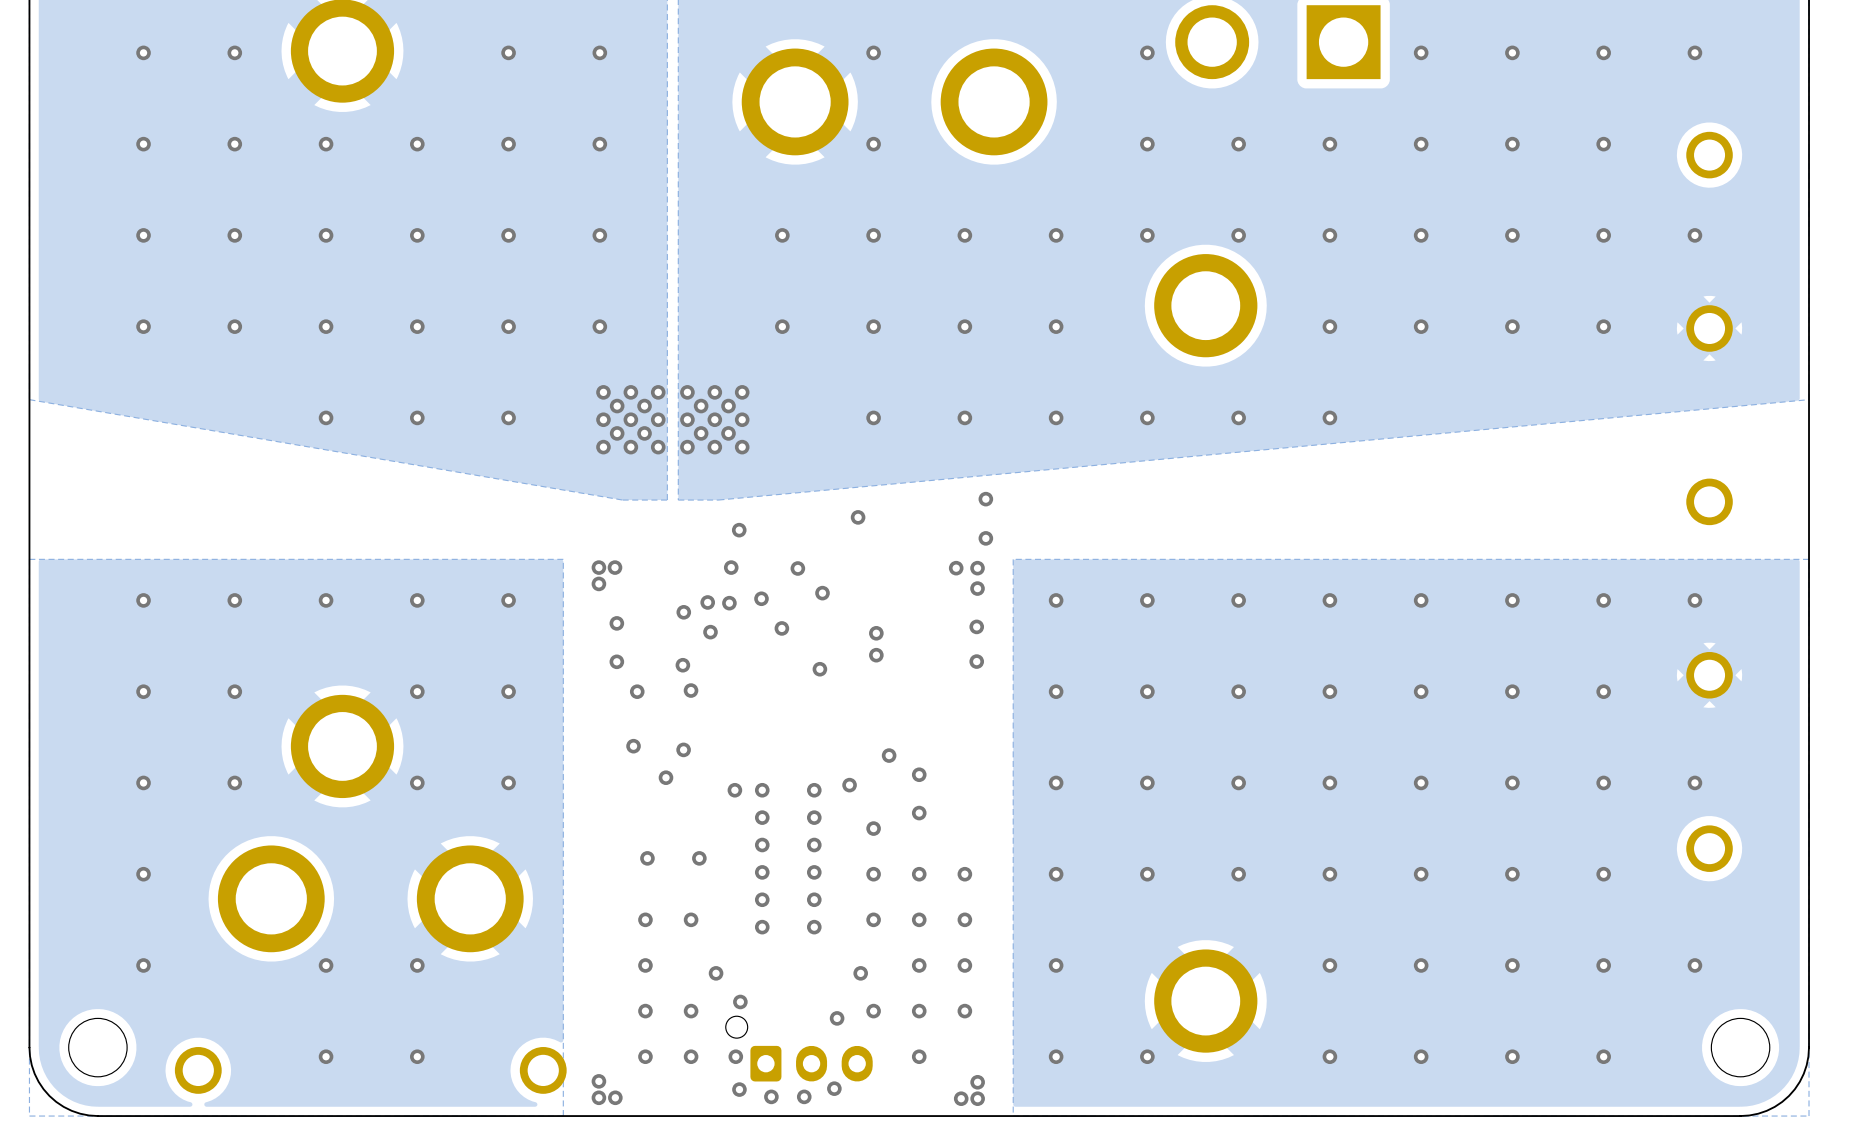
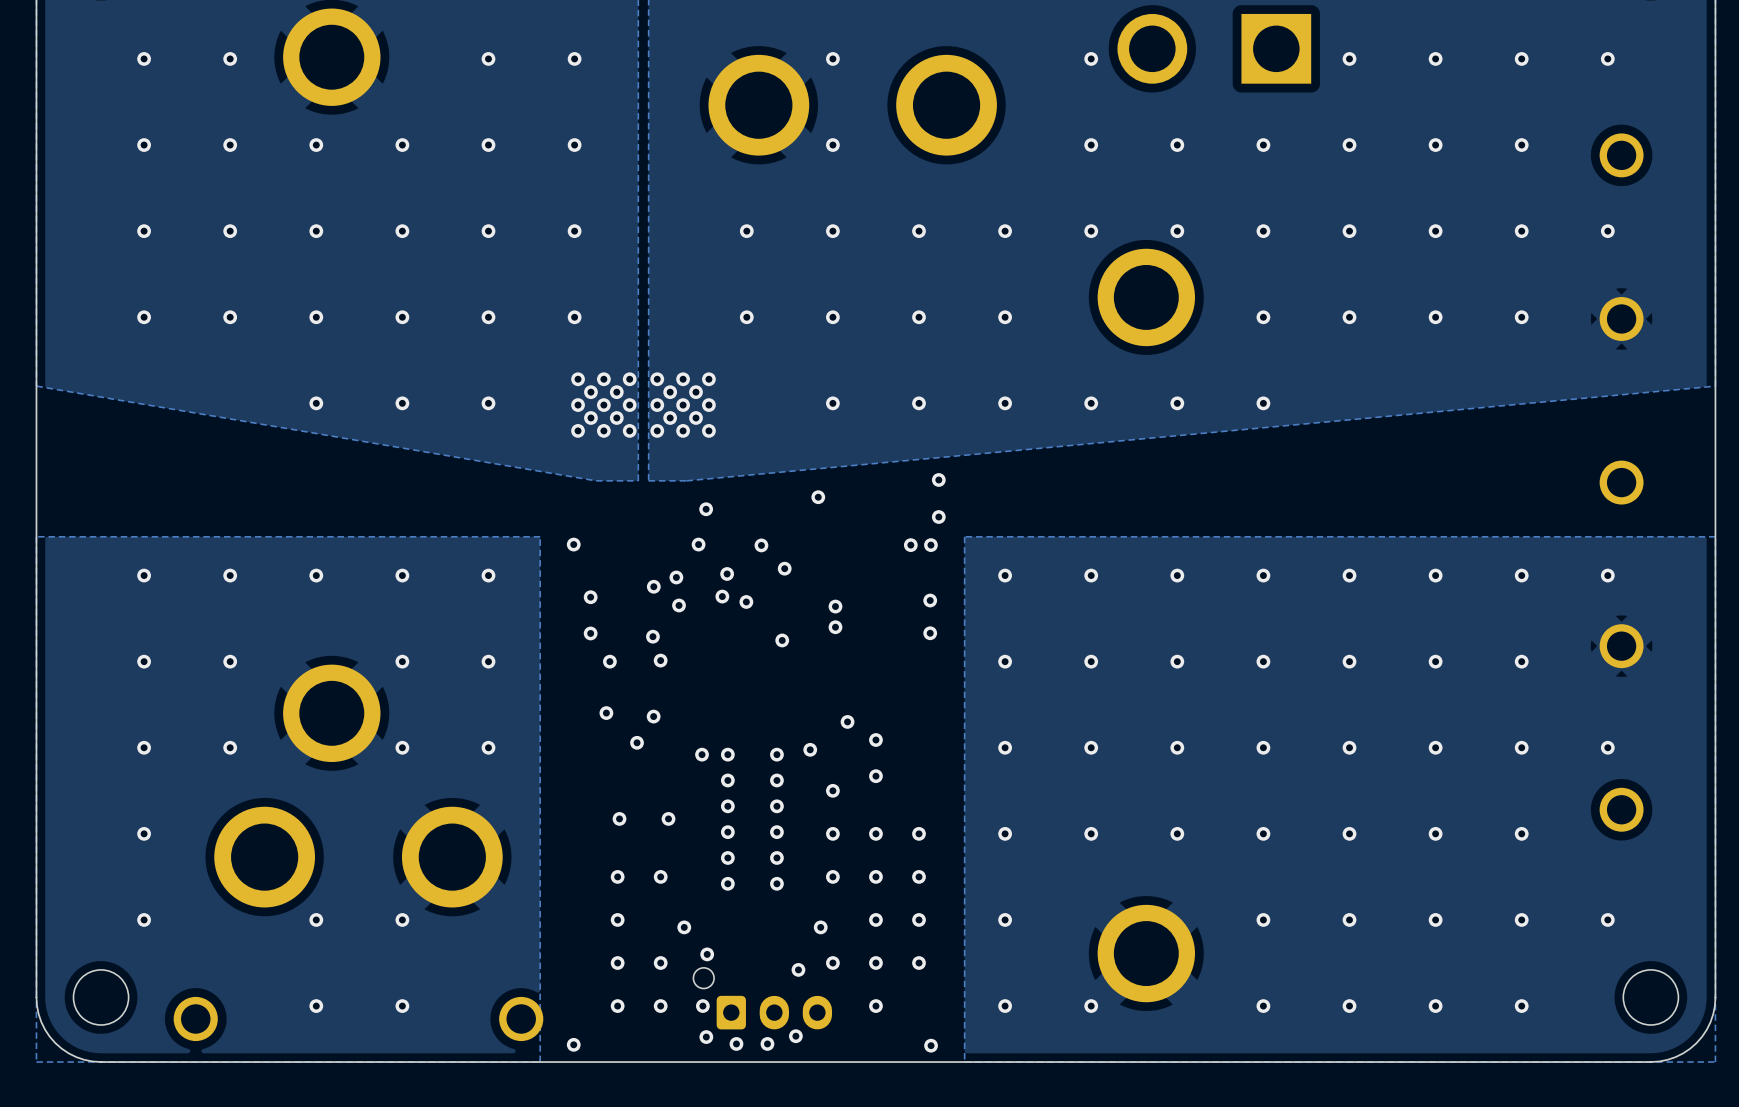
via: (614, 567) -> none
via: (598, 583) -> none
via: (977, 588) -> none
via position: (729, 603) -> (722, 596)
via: (598, 1081) -> none
via: (977, 1082) -> none
via: (615, 1097) -> none
via: (961, 1098) -> none

